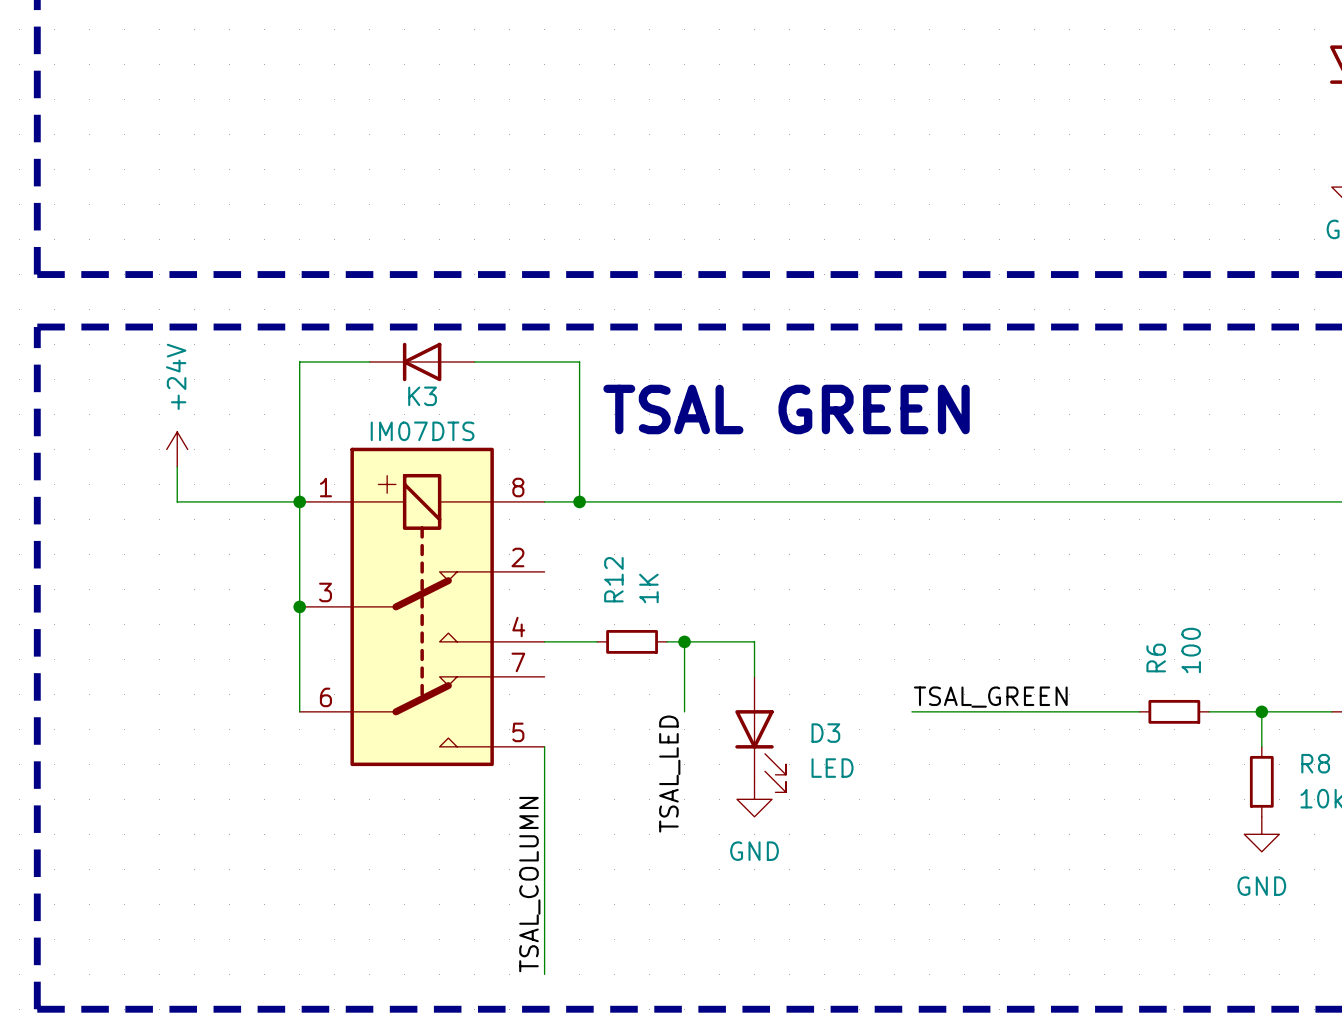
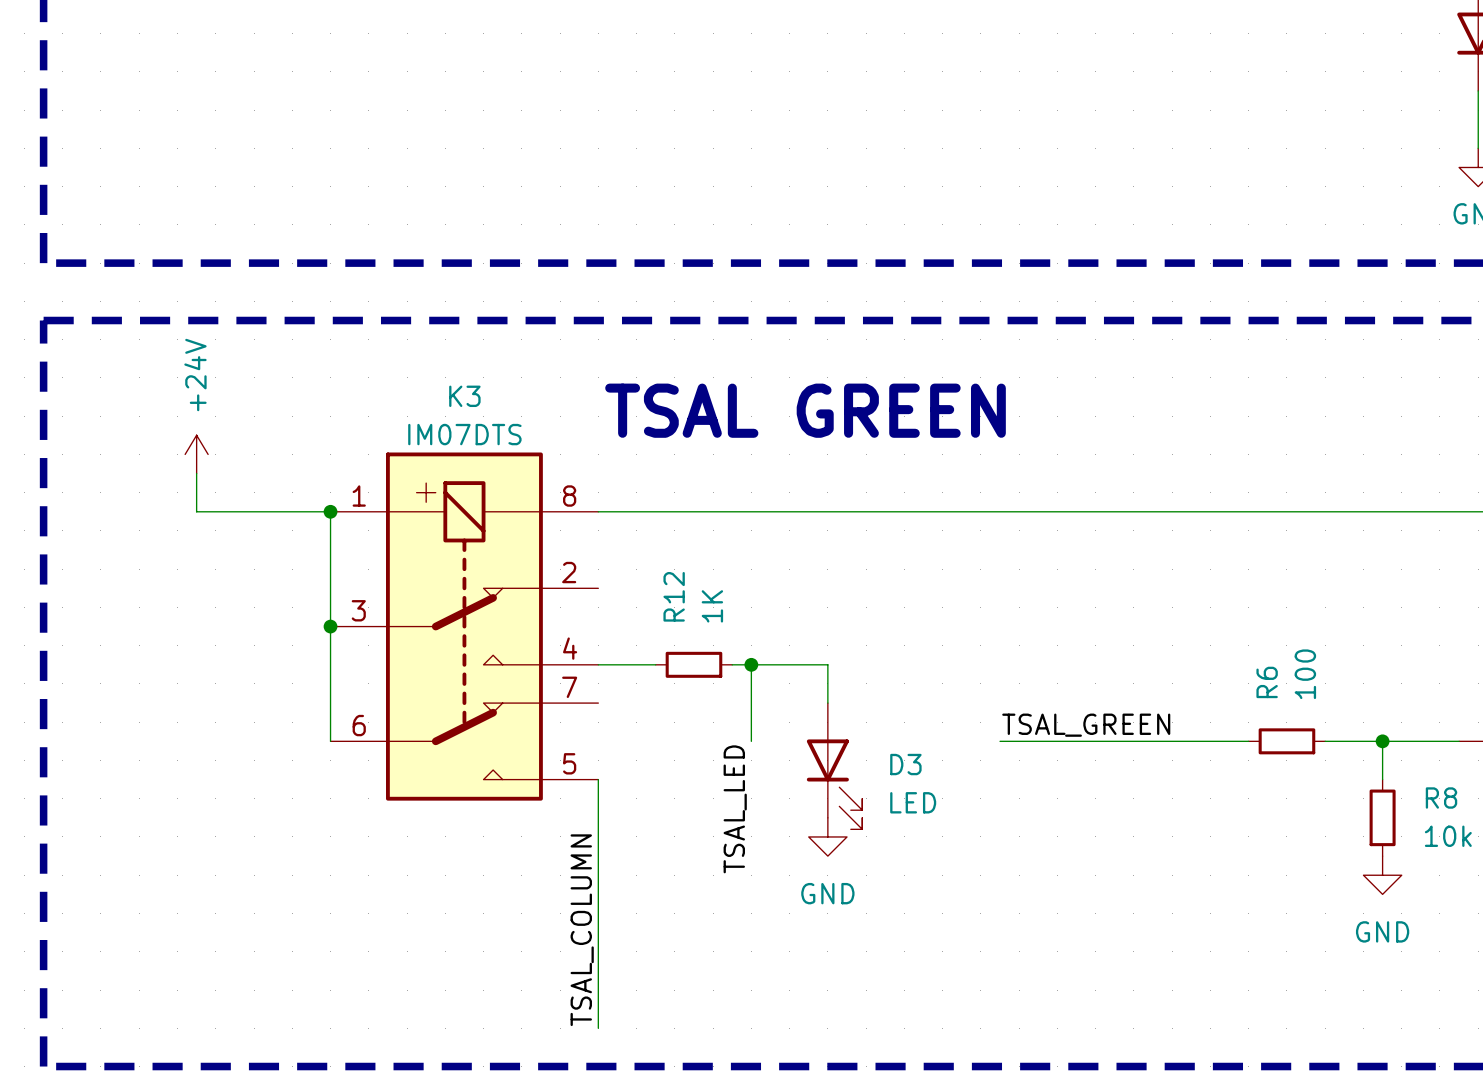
wire: (369, 362) (299, 362) (299, 501) -> none
part: (422, 362) -> none
wire: (474, 362) (579, 362) (579, 501) -> none
text position: TSAL GREEN (786, 409) -> TSAL GREEN (805, 410)
junction: (579, 501) -> none

